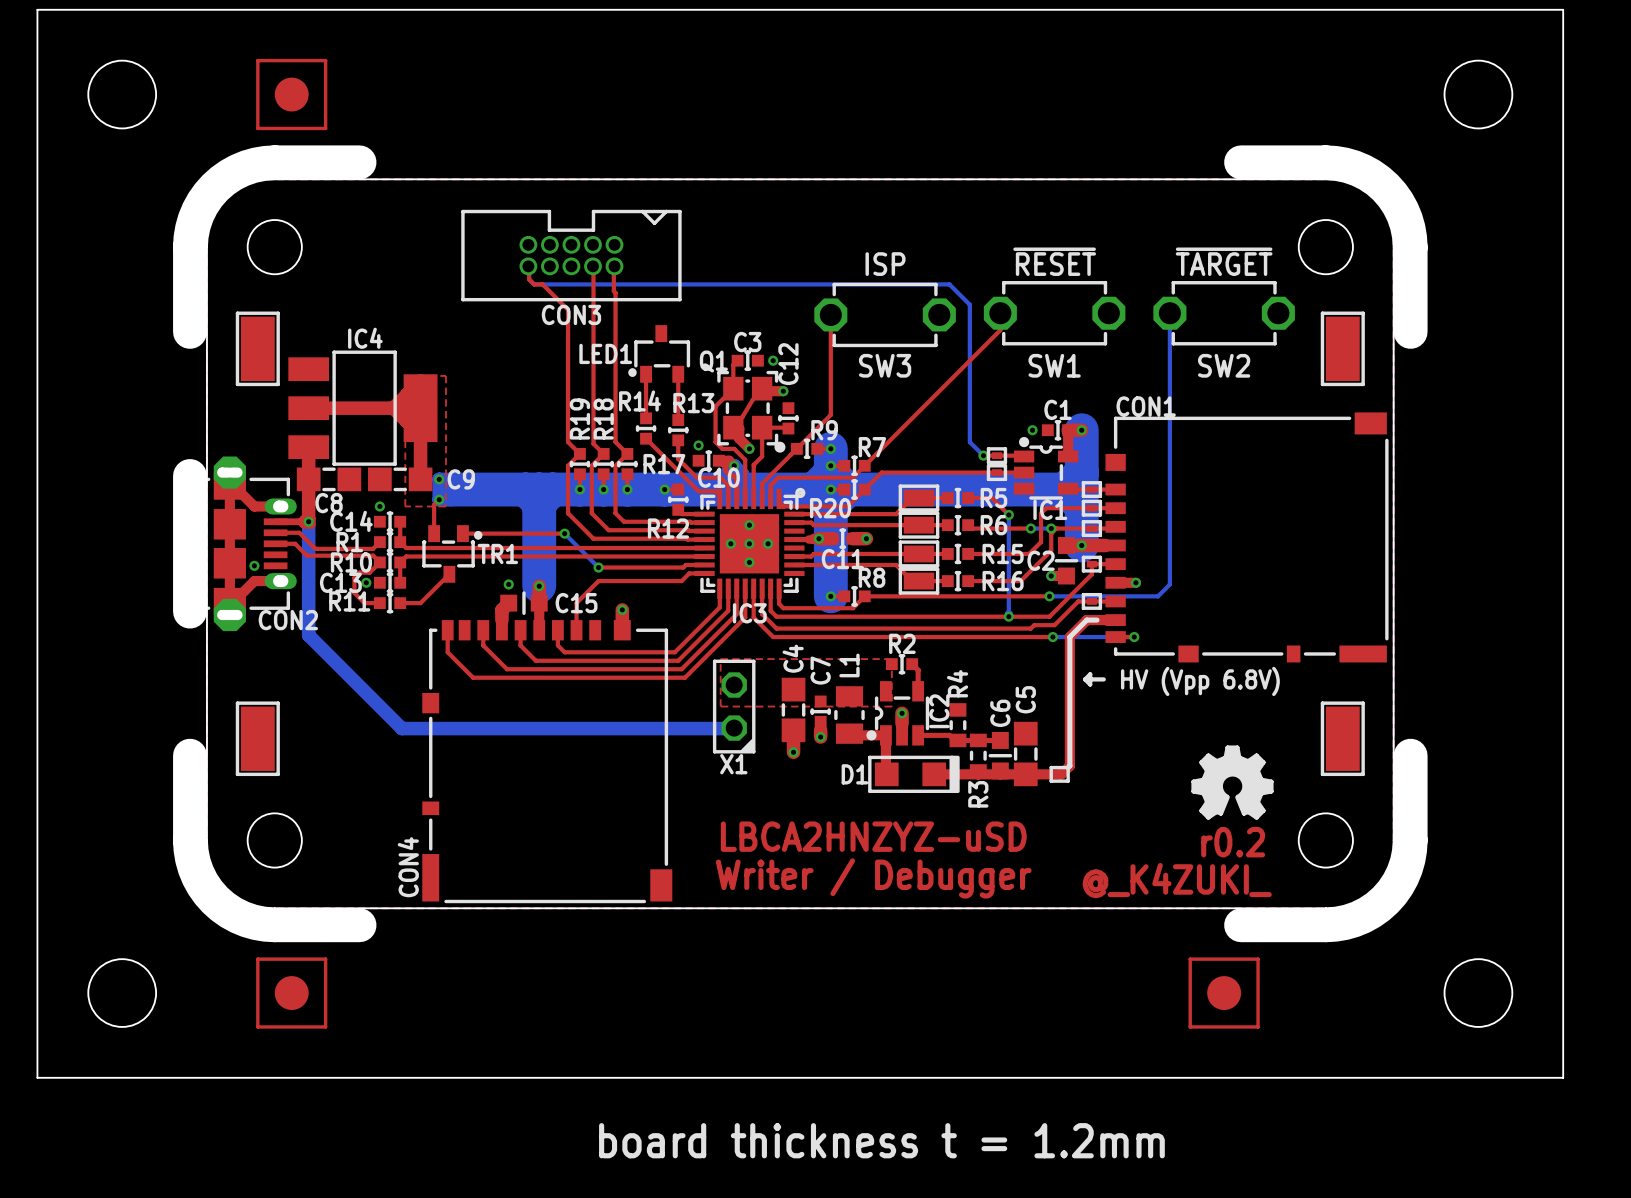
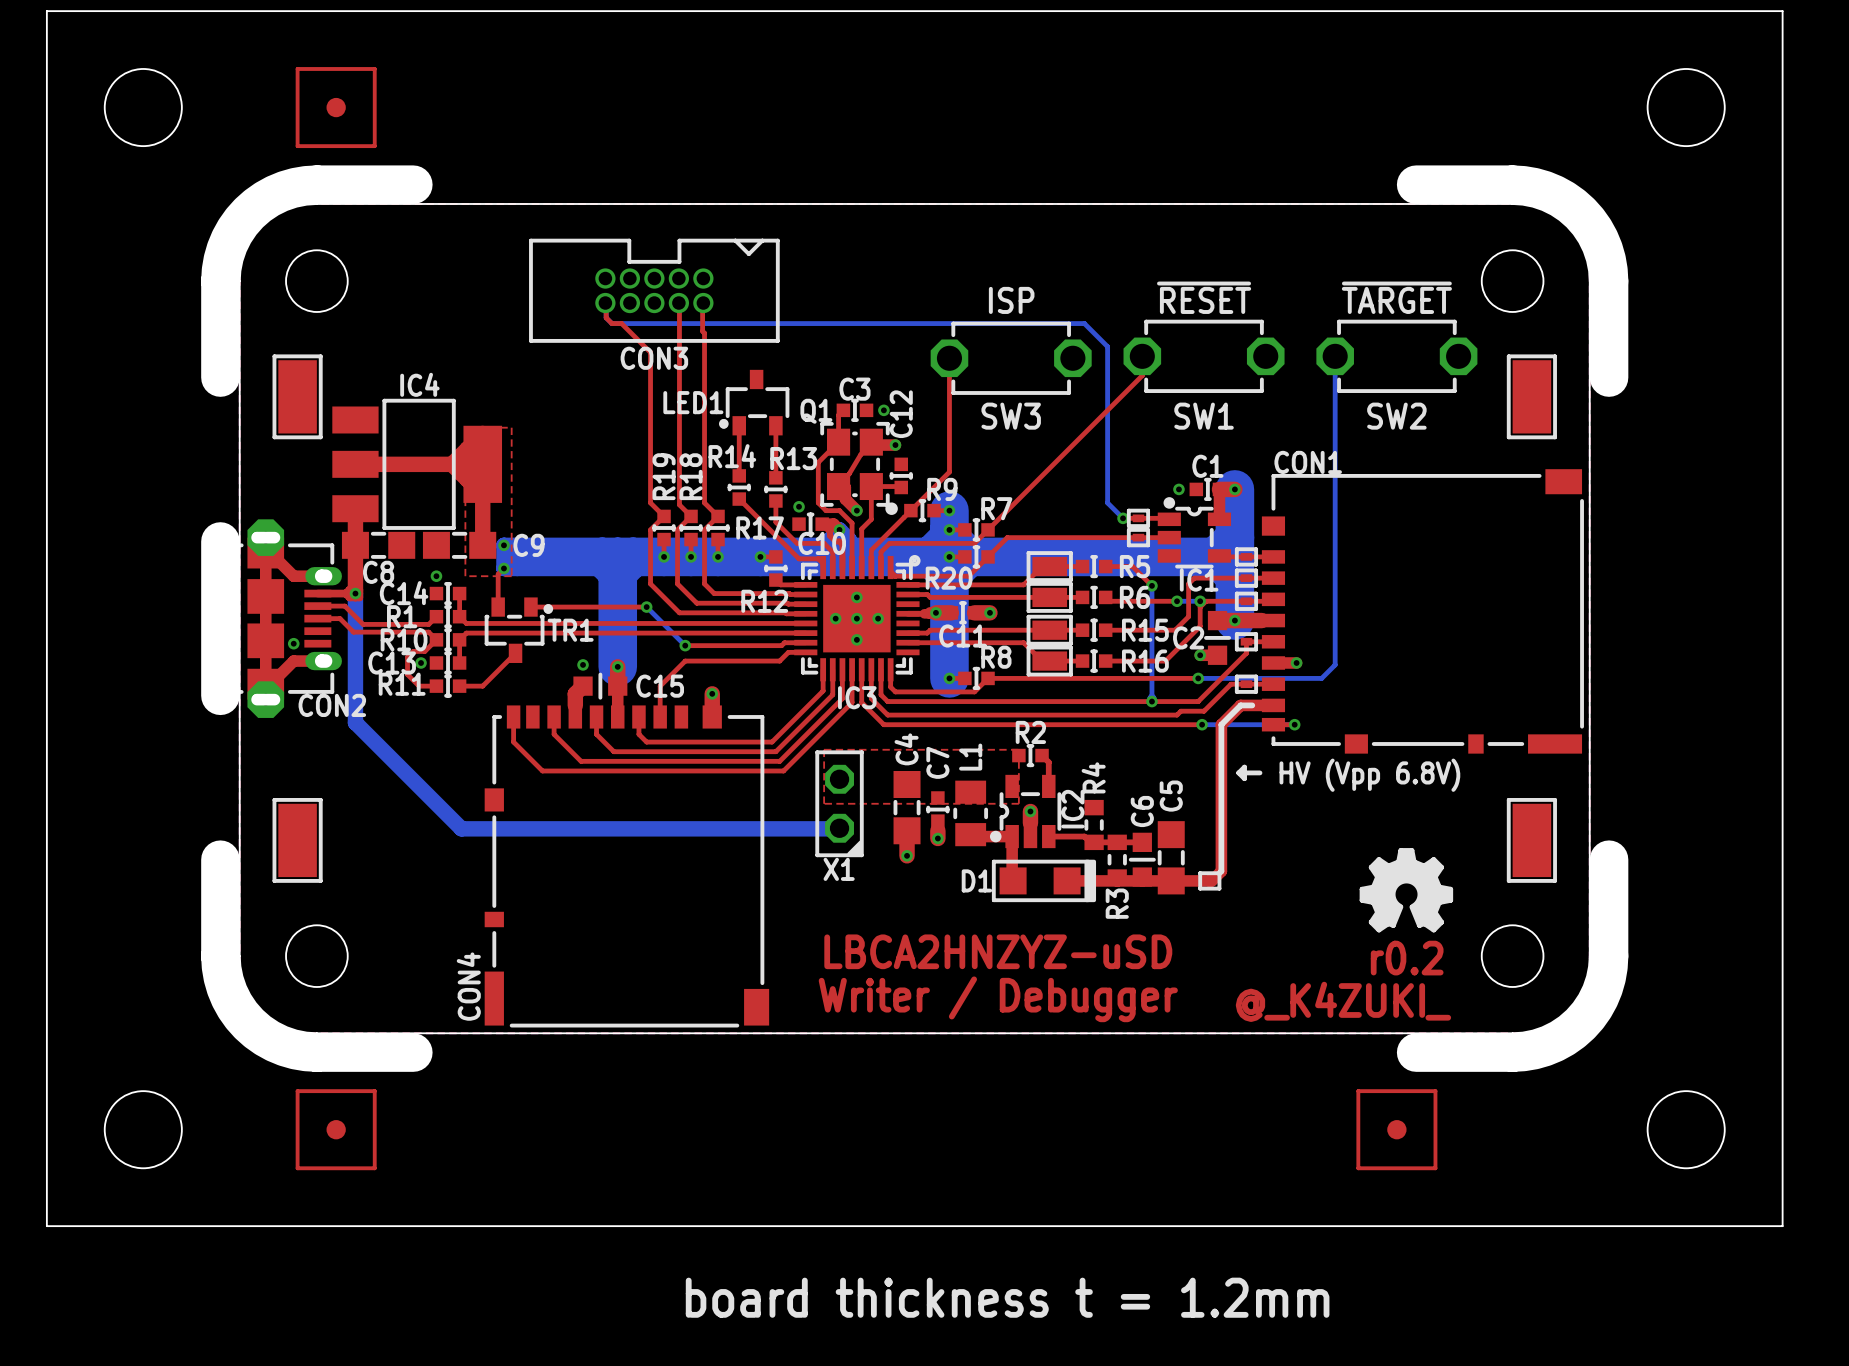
part footprint: [256, 58, 328, 131] -> [295, 67, 377, 149]
part footprint: [256, 957, 328, 1029] -> [295, 1089, 377, 1171]
part footprint: [1188, 957, 1260, 1029] -> [1356, 1089, 1438, 1171]

